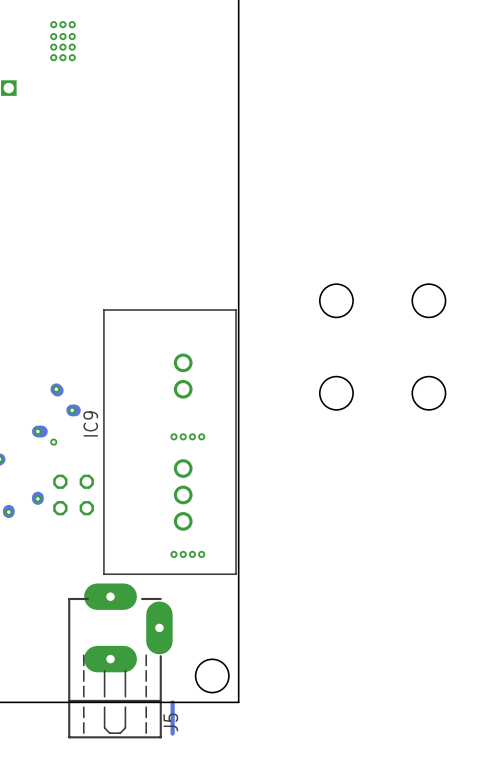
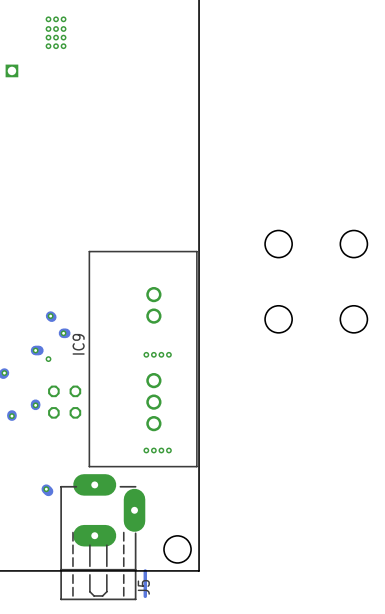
track: none -> (46, 489) (48, 491)
via: none -> (46, 489)

